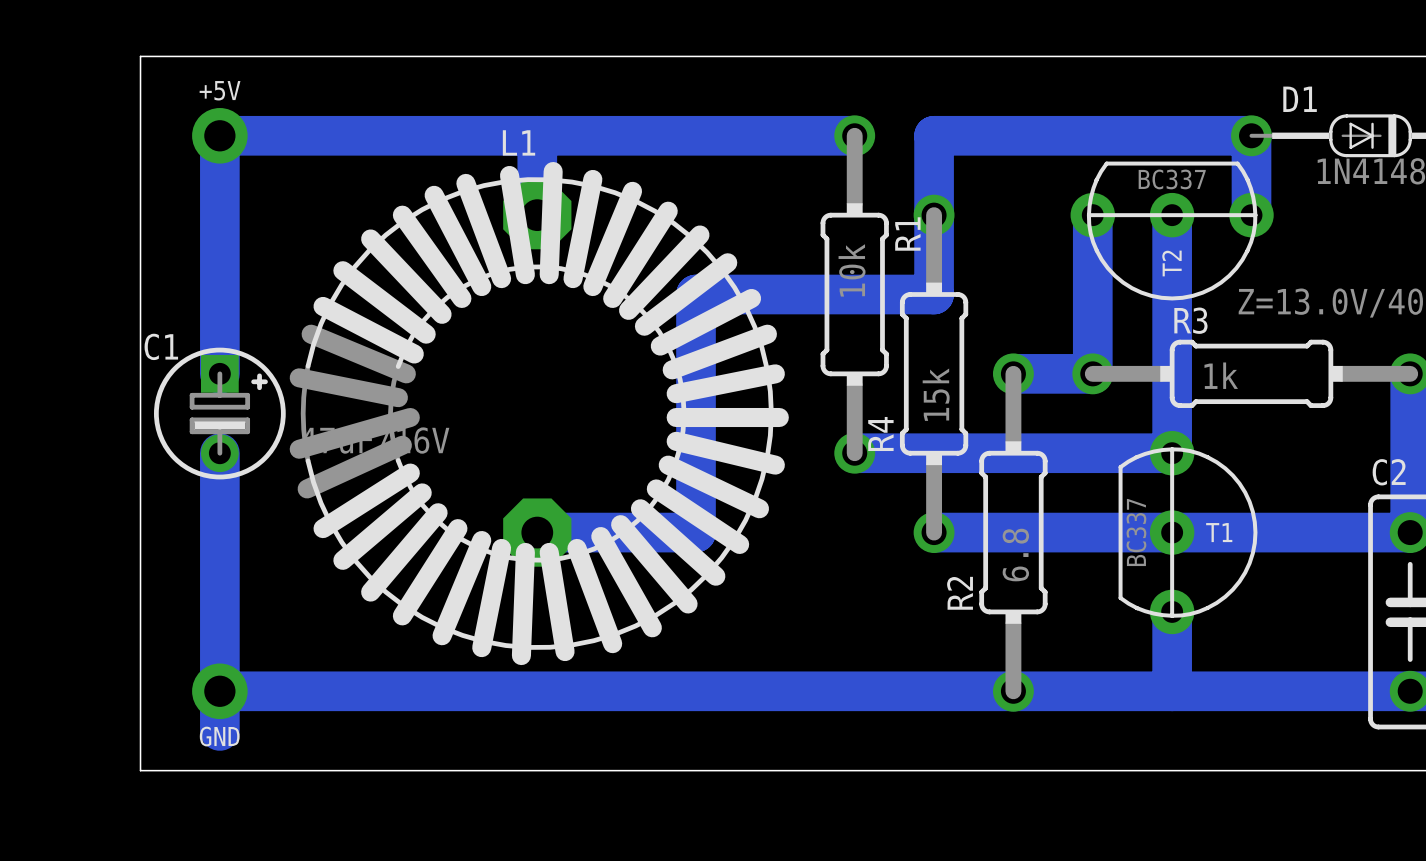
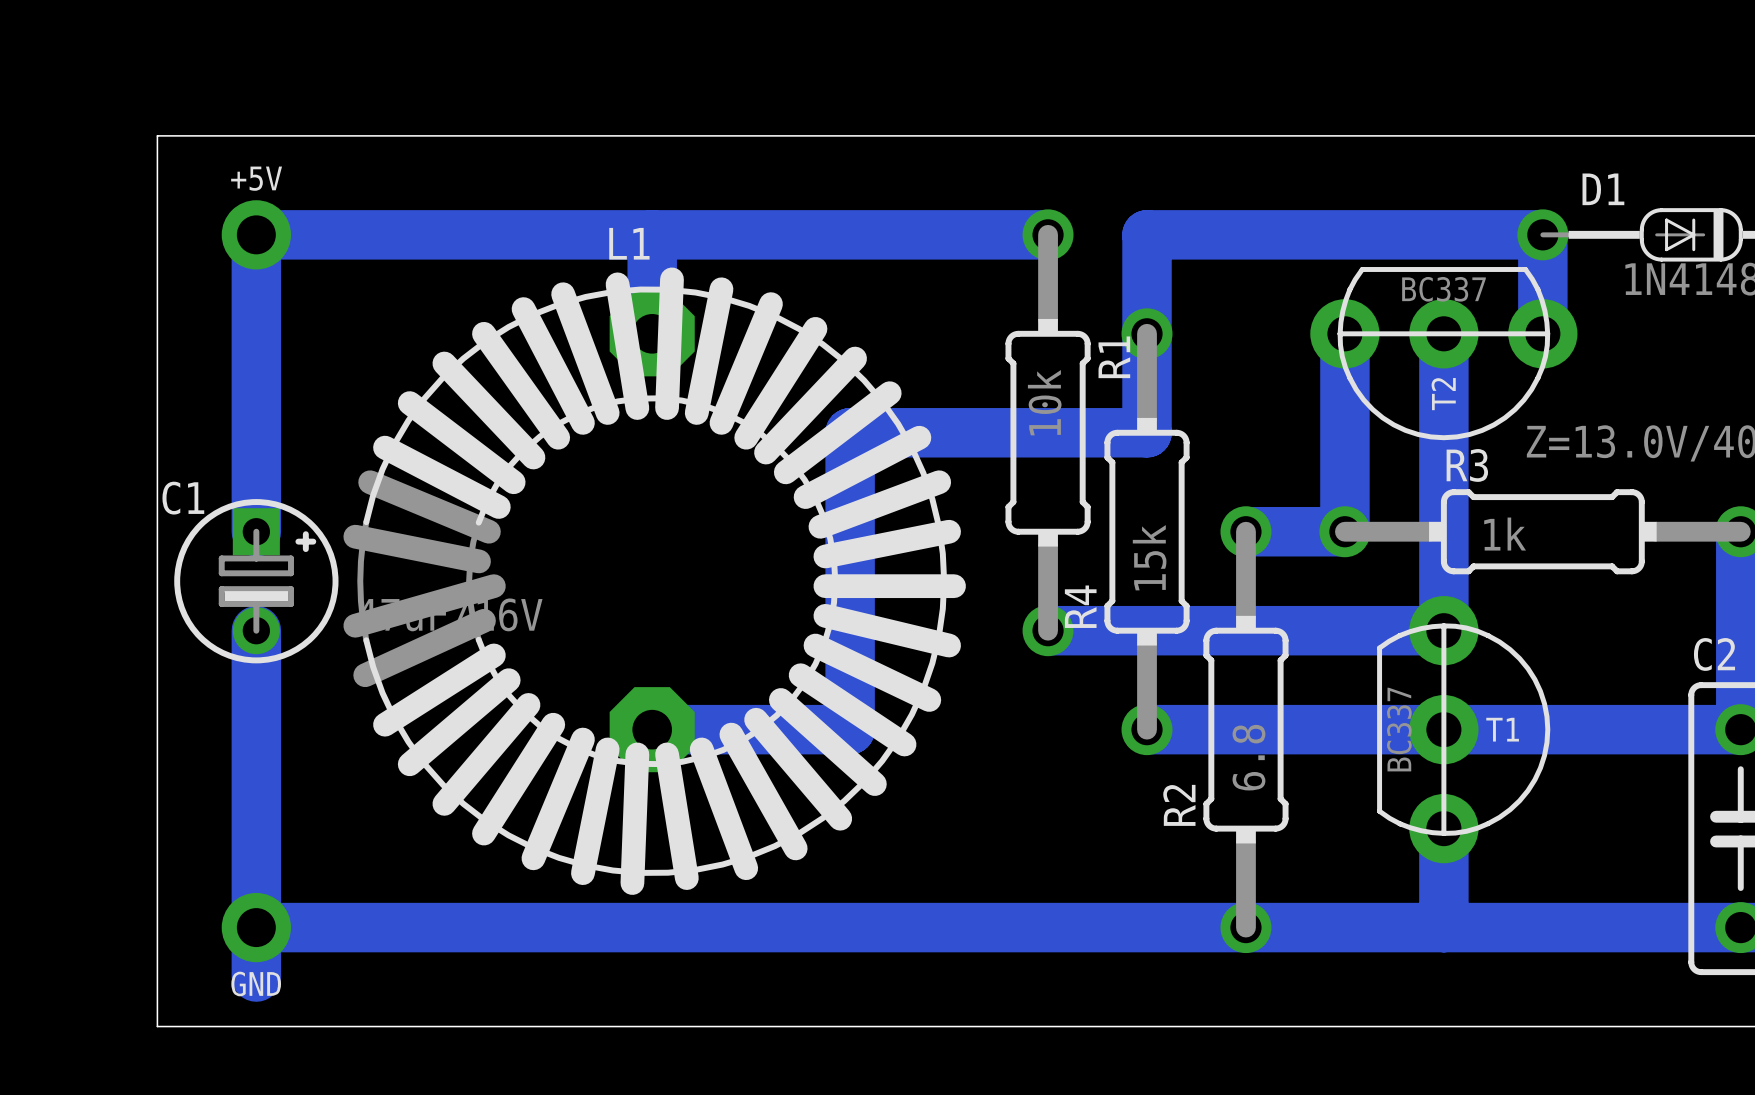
T2 footprint: [1070, 161, 1274, 301] -> [1310, 267, 1578, 441]
T1 footprint: [1118, 430, 1258, 635] -> [1377, 596, 1551, 864]

